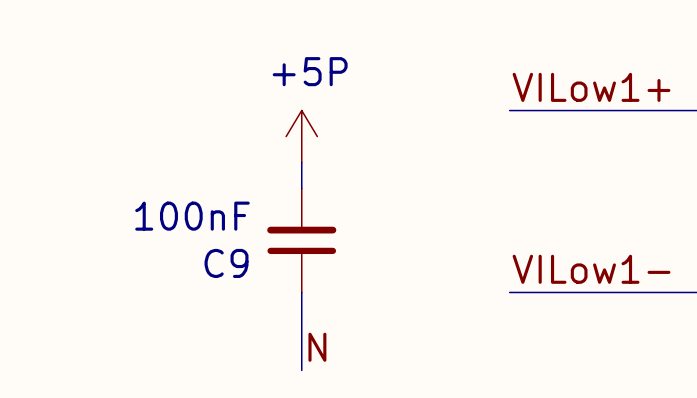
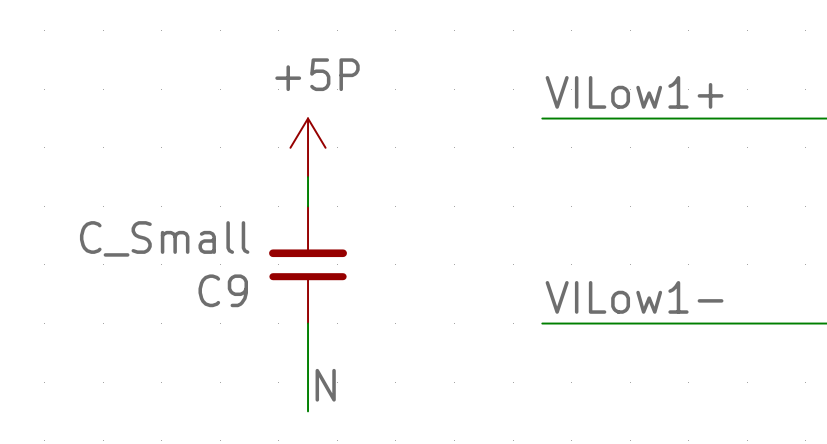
C9 value: 100nF (192, 216) -> C_Small (164, 238)

